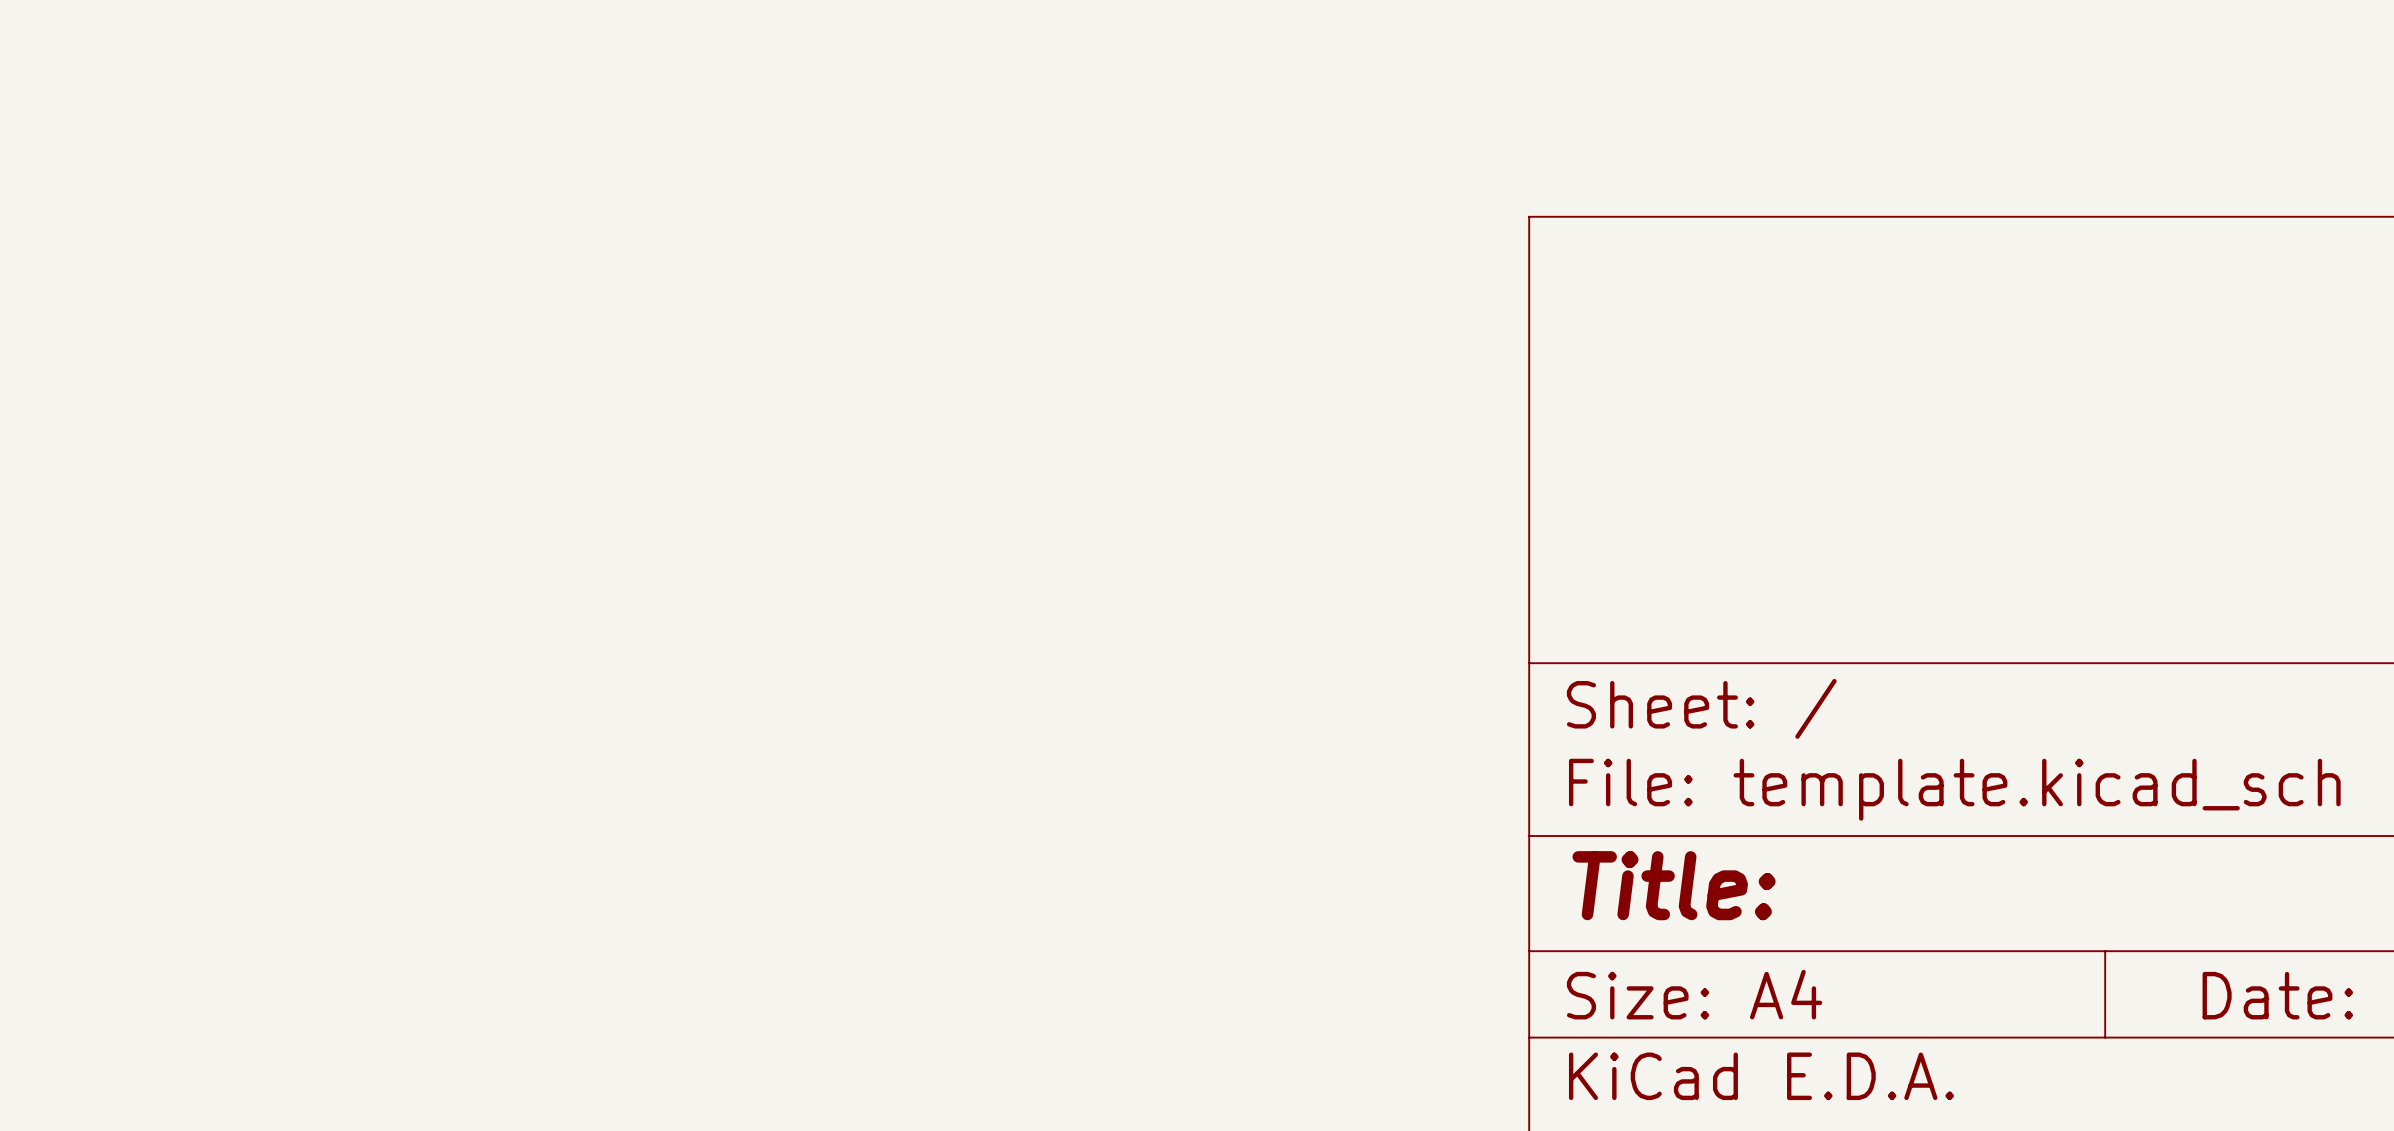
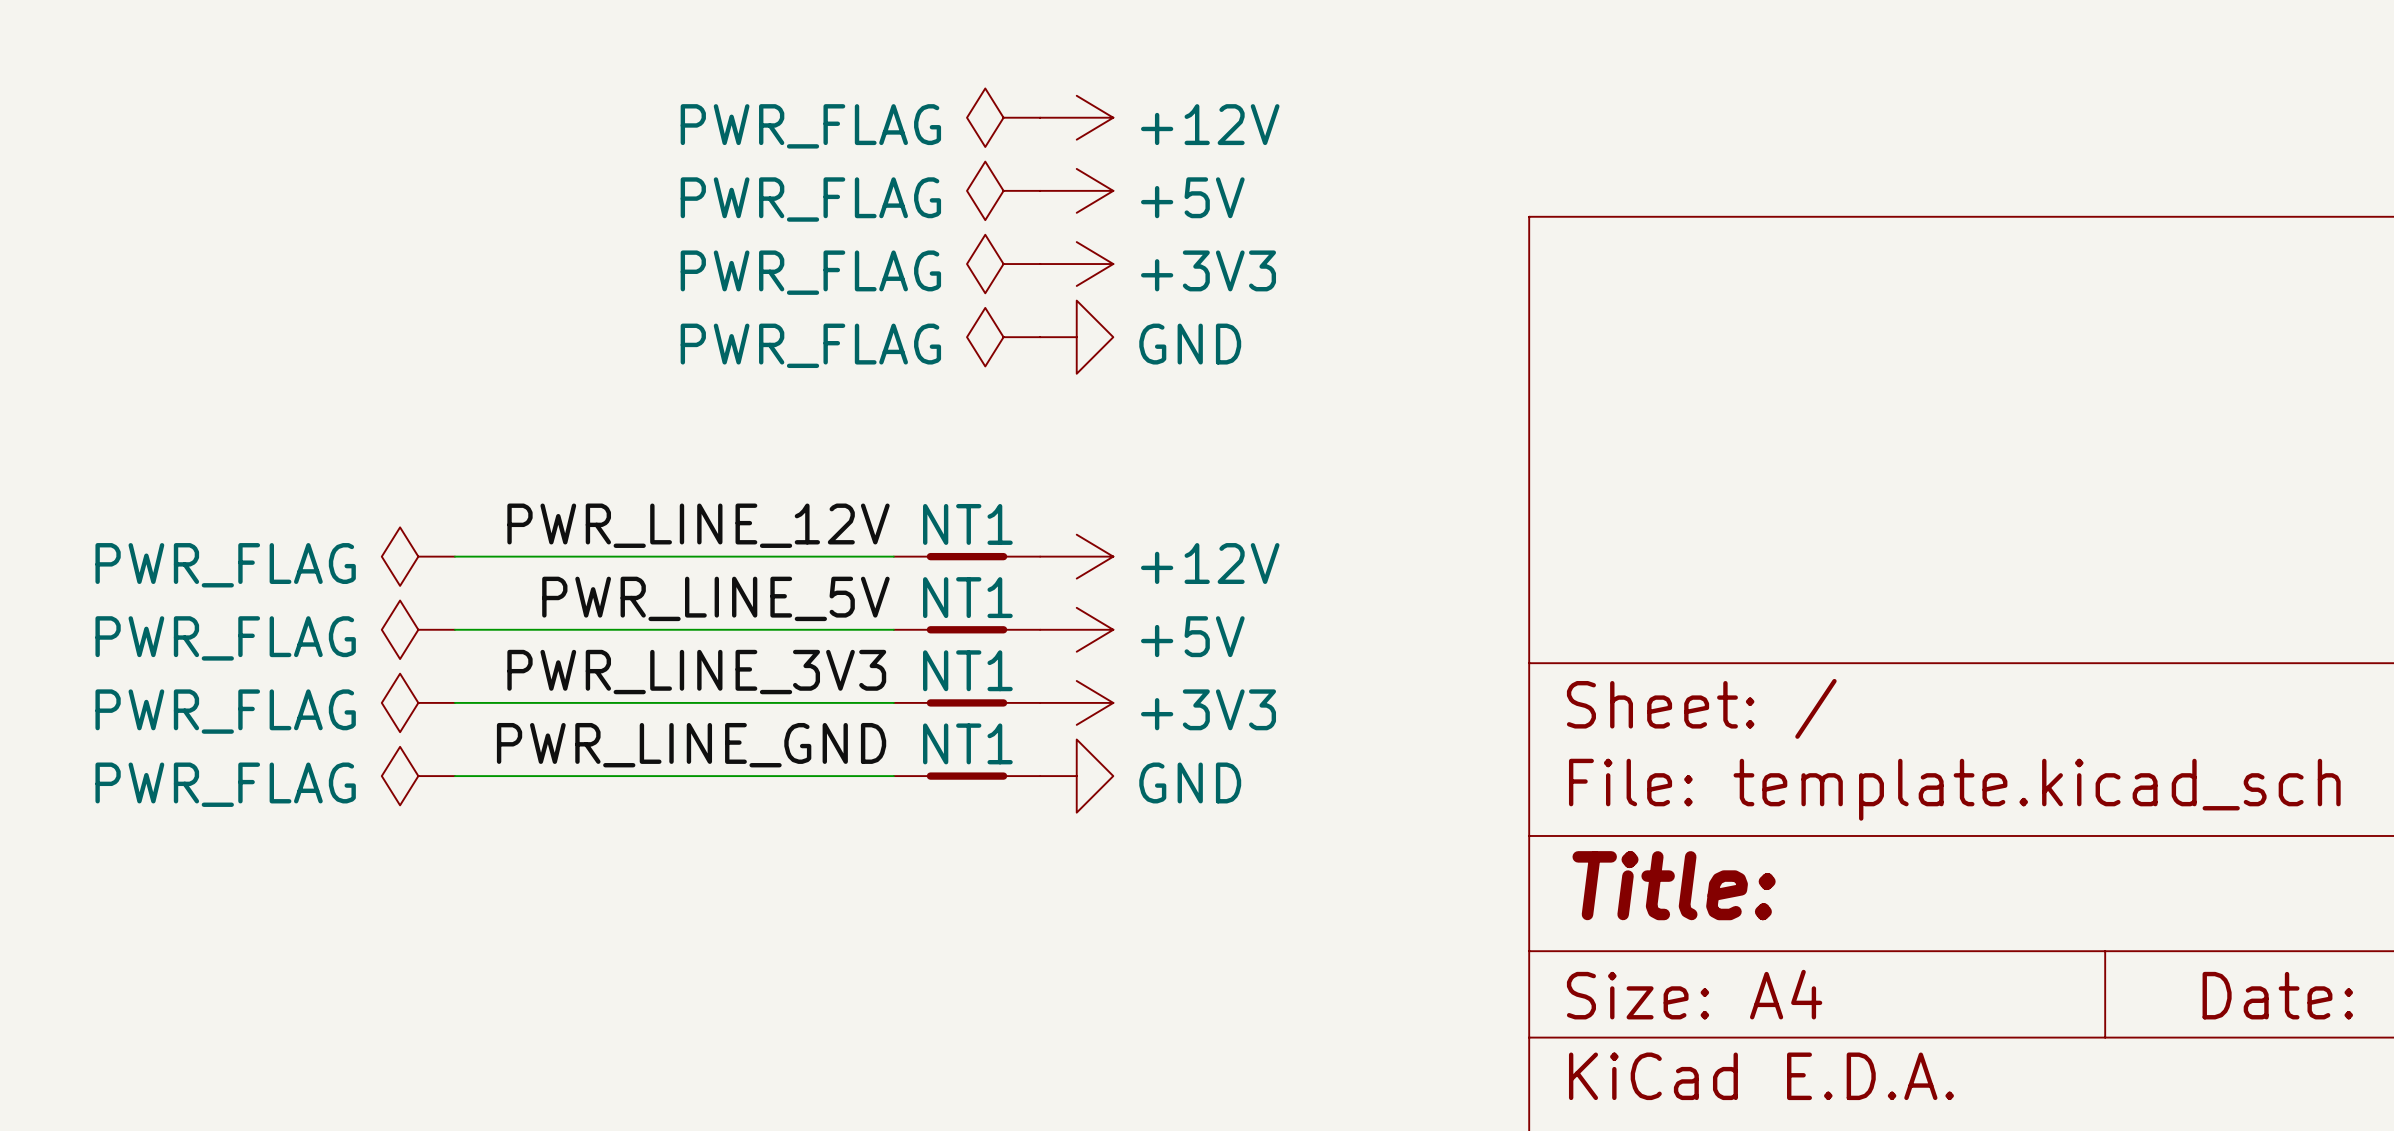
power symbol: none -> PWR_FLAG (1003, 117)
power symbol: none -> +12V (1076, 117)
power symbol: none -> PWR_FLAG (1003, 190)
power symbol: none -> +5V (1076, 190)
power symbol: none -> PWR_FLAG (1003, 264)
power symbol: none -> +3V3 (1076, 264)
power symbol: none -> PWR_FLAG (1003, 337)
power symbol: none -> GND (1076, 337)
label: none -> PWR_LINE_12V (698, 525)
power symbol: none -> PWR_FLAG (418, 556)
wire: none -> (454, 556) (893, 556)
NT1: none -> (967, 556)
power symbol: none -> +12V (1076, 556)
label: none -> PWR_LINE_5V (715, 598)
power symbol: none -> PWR_FLAG (418, 629)
wire: none -> (454, 629) (893, 629)
NT1: none -> (967, 629)
power symbol: none -> +5V (1076, 629)
label: none -> PWR_LINE_3V3 (696, 672)
power symbol: none -> PWR_FLAG (418, 702)
wire: none -> (454, 702) (893, 702)
NT1: none -> (967, 702)
power symbol: none -> +3V3 (1076, 702)
label: none -> PWR_LINE_GND (691, 745)
power symbol: none -> PWR_FLAG (418, 776)
wire: none -> (454, 776) (893, 776)
NT1: none -> (967, 776)
power symbol: none -> GND (1076, 776)

